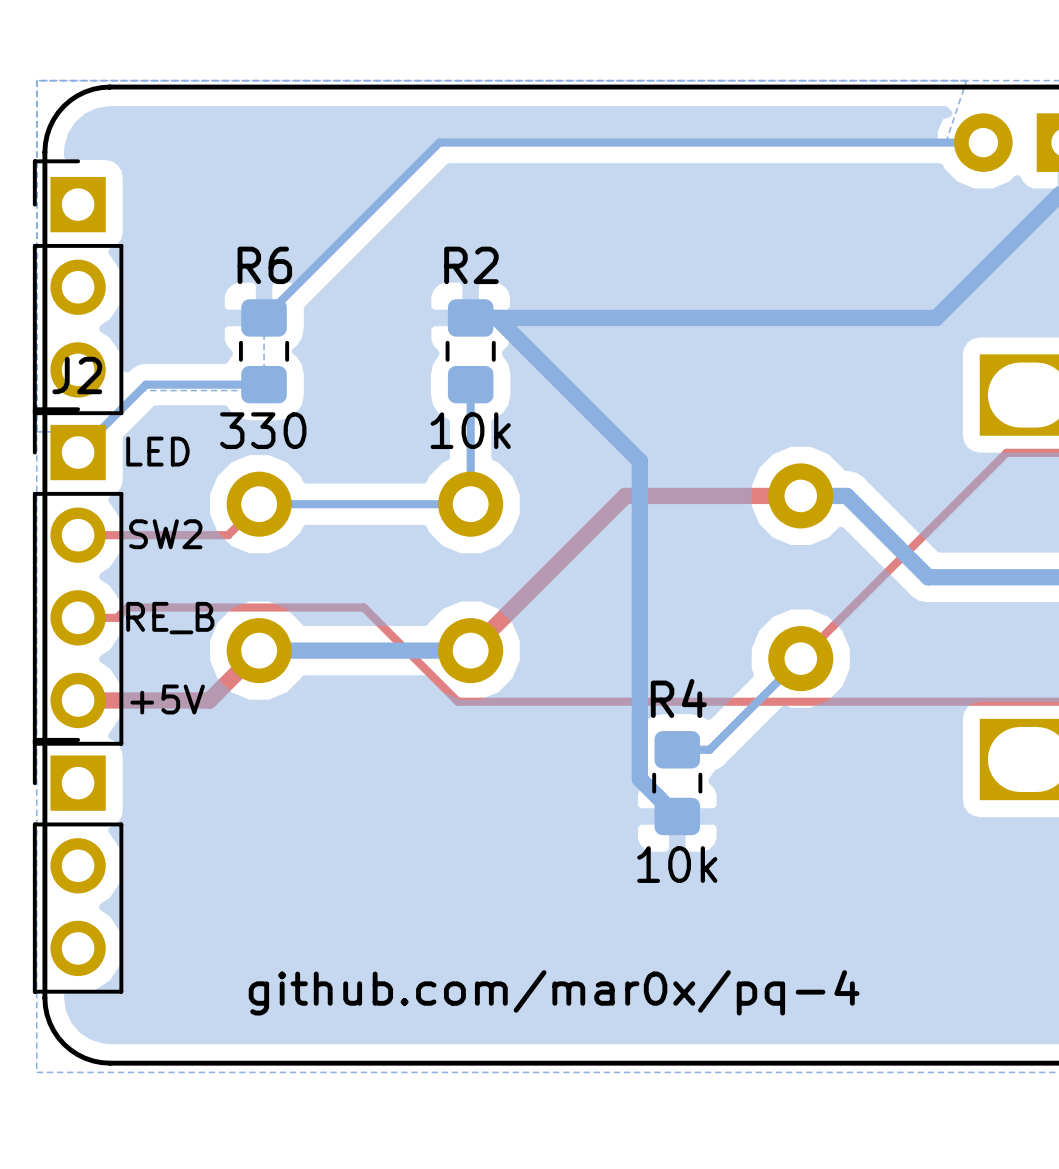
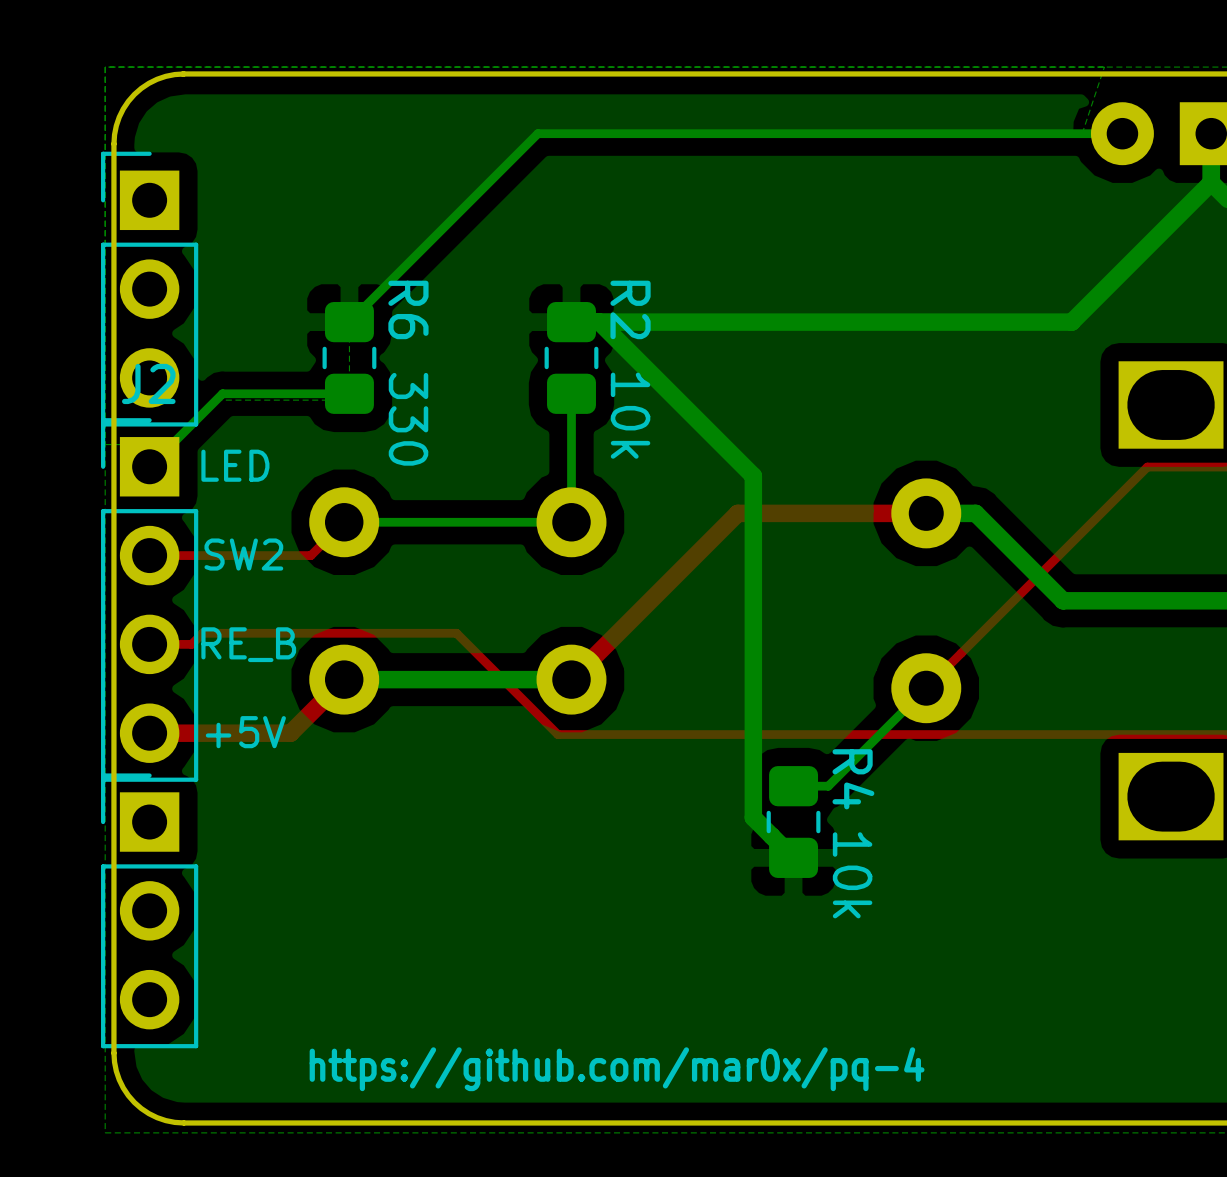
R6 name rotation: 0° (264, 265) -> 90° clockwise (408, 309)
R2 name rotation: 0° (471, 265) -> 90° clockwise (630, 309)
R6 value rotation: 0° (263, 430) -> 90° clockwise (408, 419)
R2 value rotation: 0° (470, 430) -> 90° clockwise (630, 415)
R4 name rotation: 0° (678, 698) -> 90° clockwise (853, 779)
R4 value rotation: 0° (677, 864) -> 90° clockwise (852, 875)
text: github.com/mar0x/pq-4 (554, 992) -> https://github.com/mar0x/pq-4 (617, 1069)

